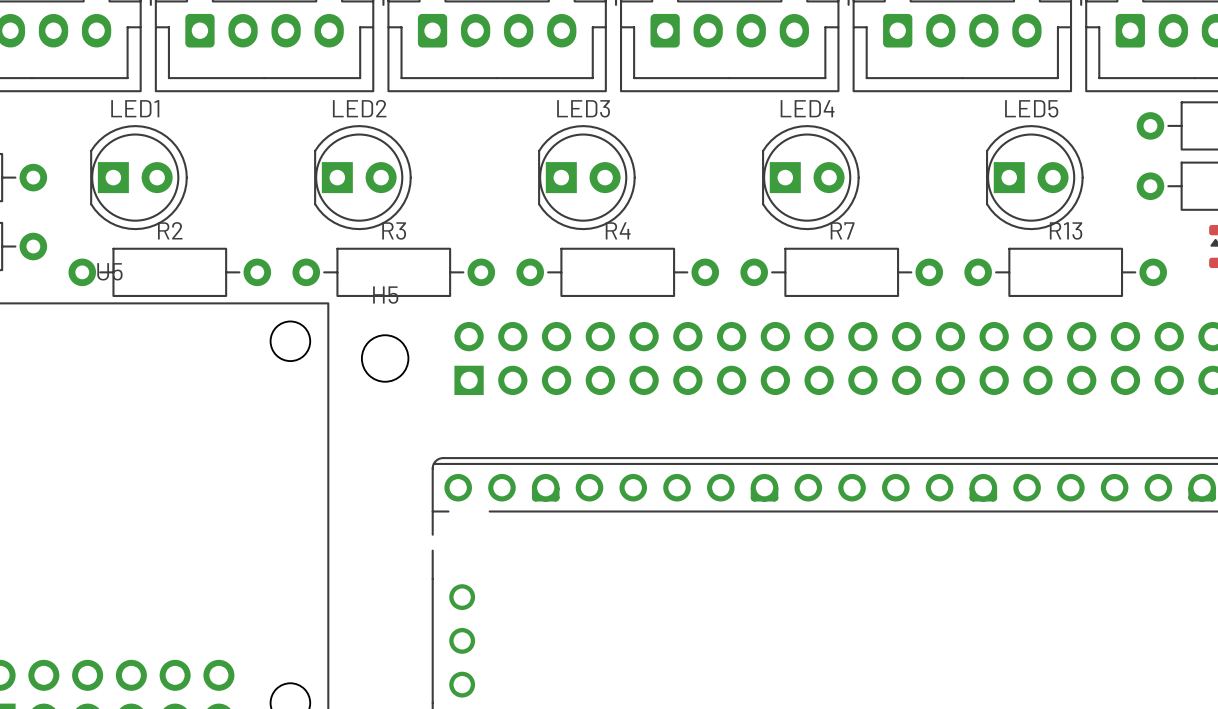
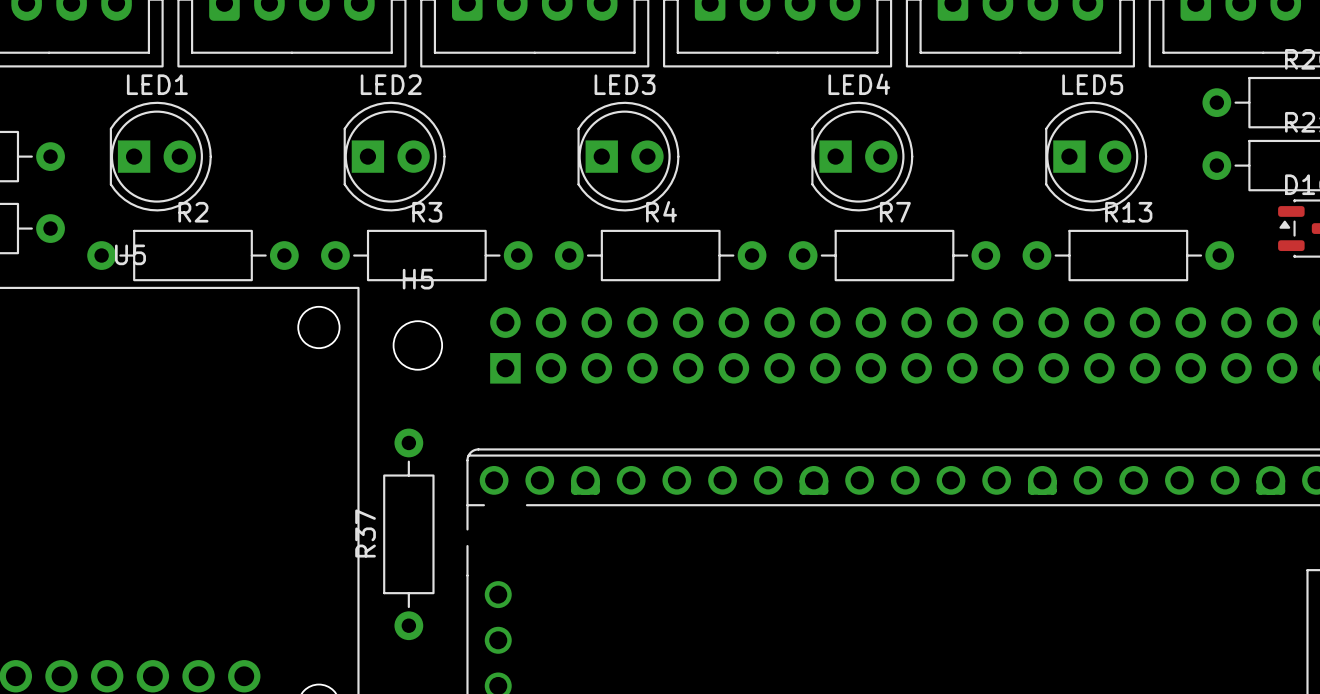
R37: none -> (408, 534)

